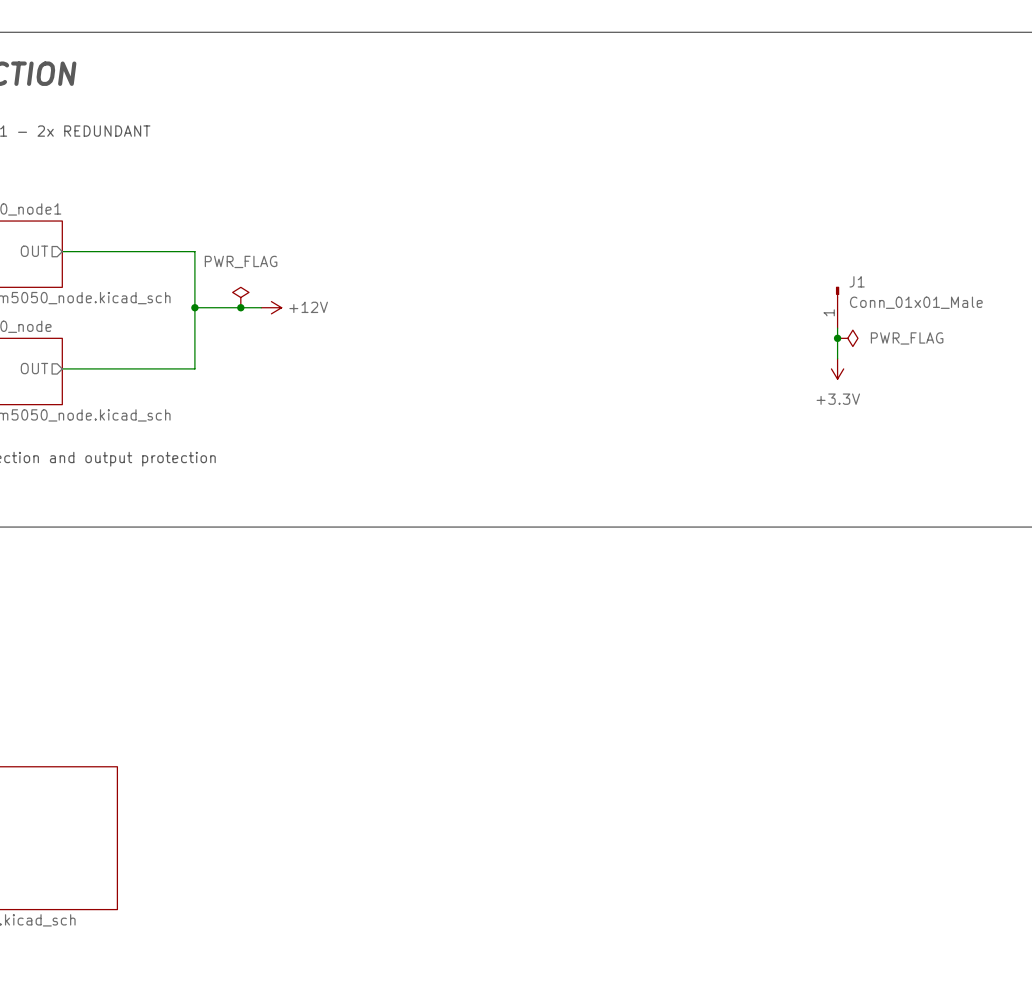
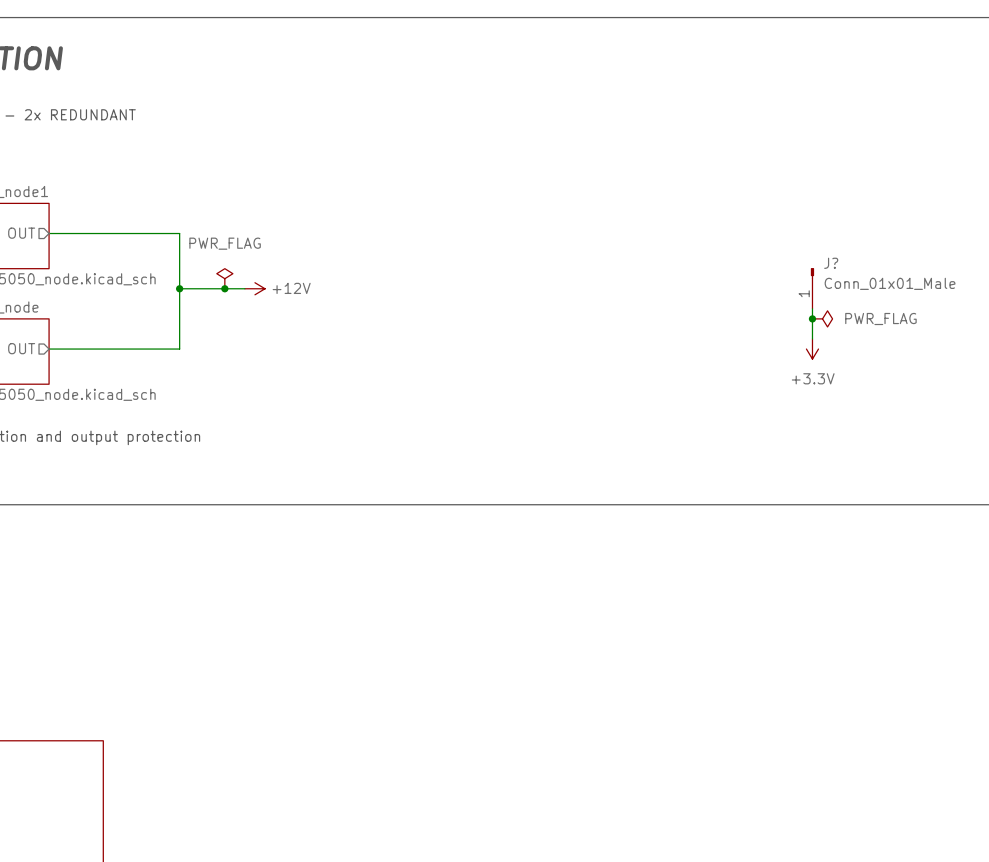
J1 name: J1 (857, 281) -> J? (831, 263)

